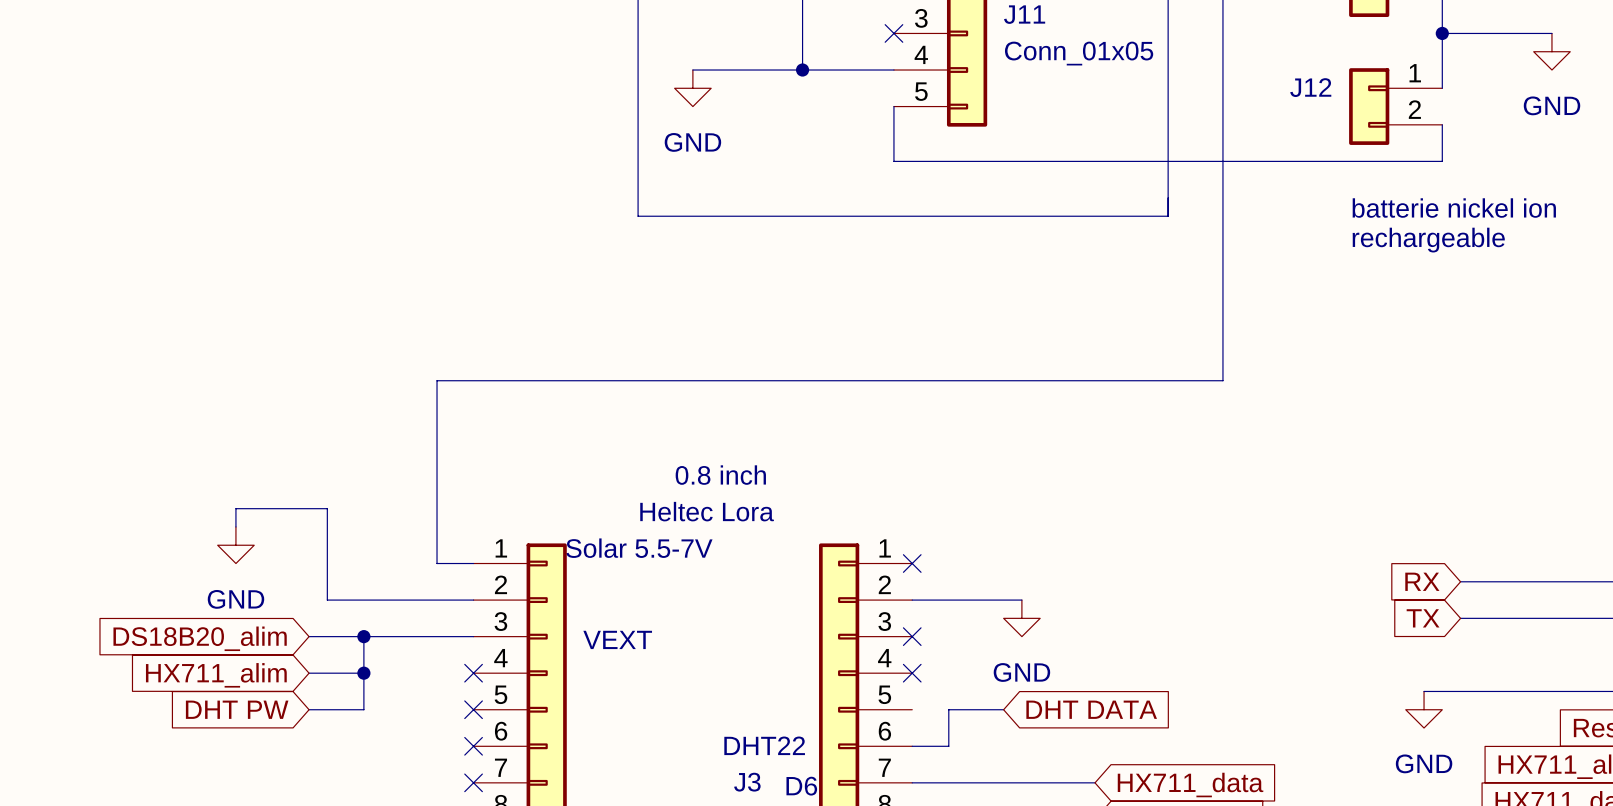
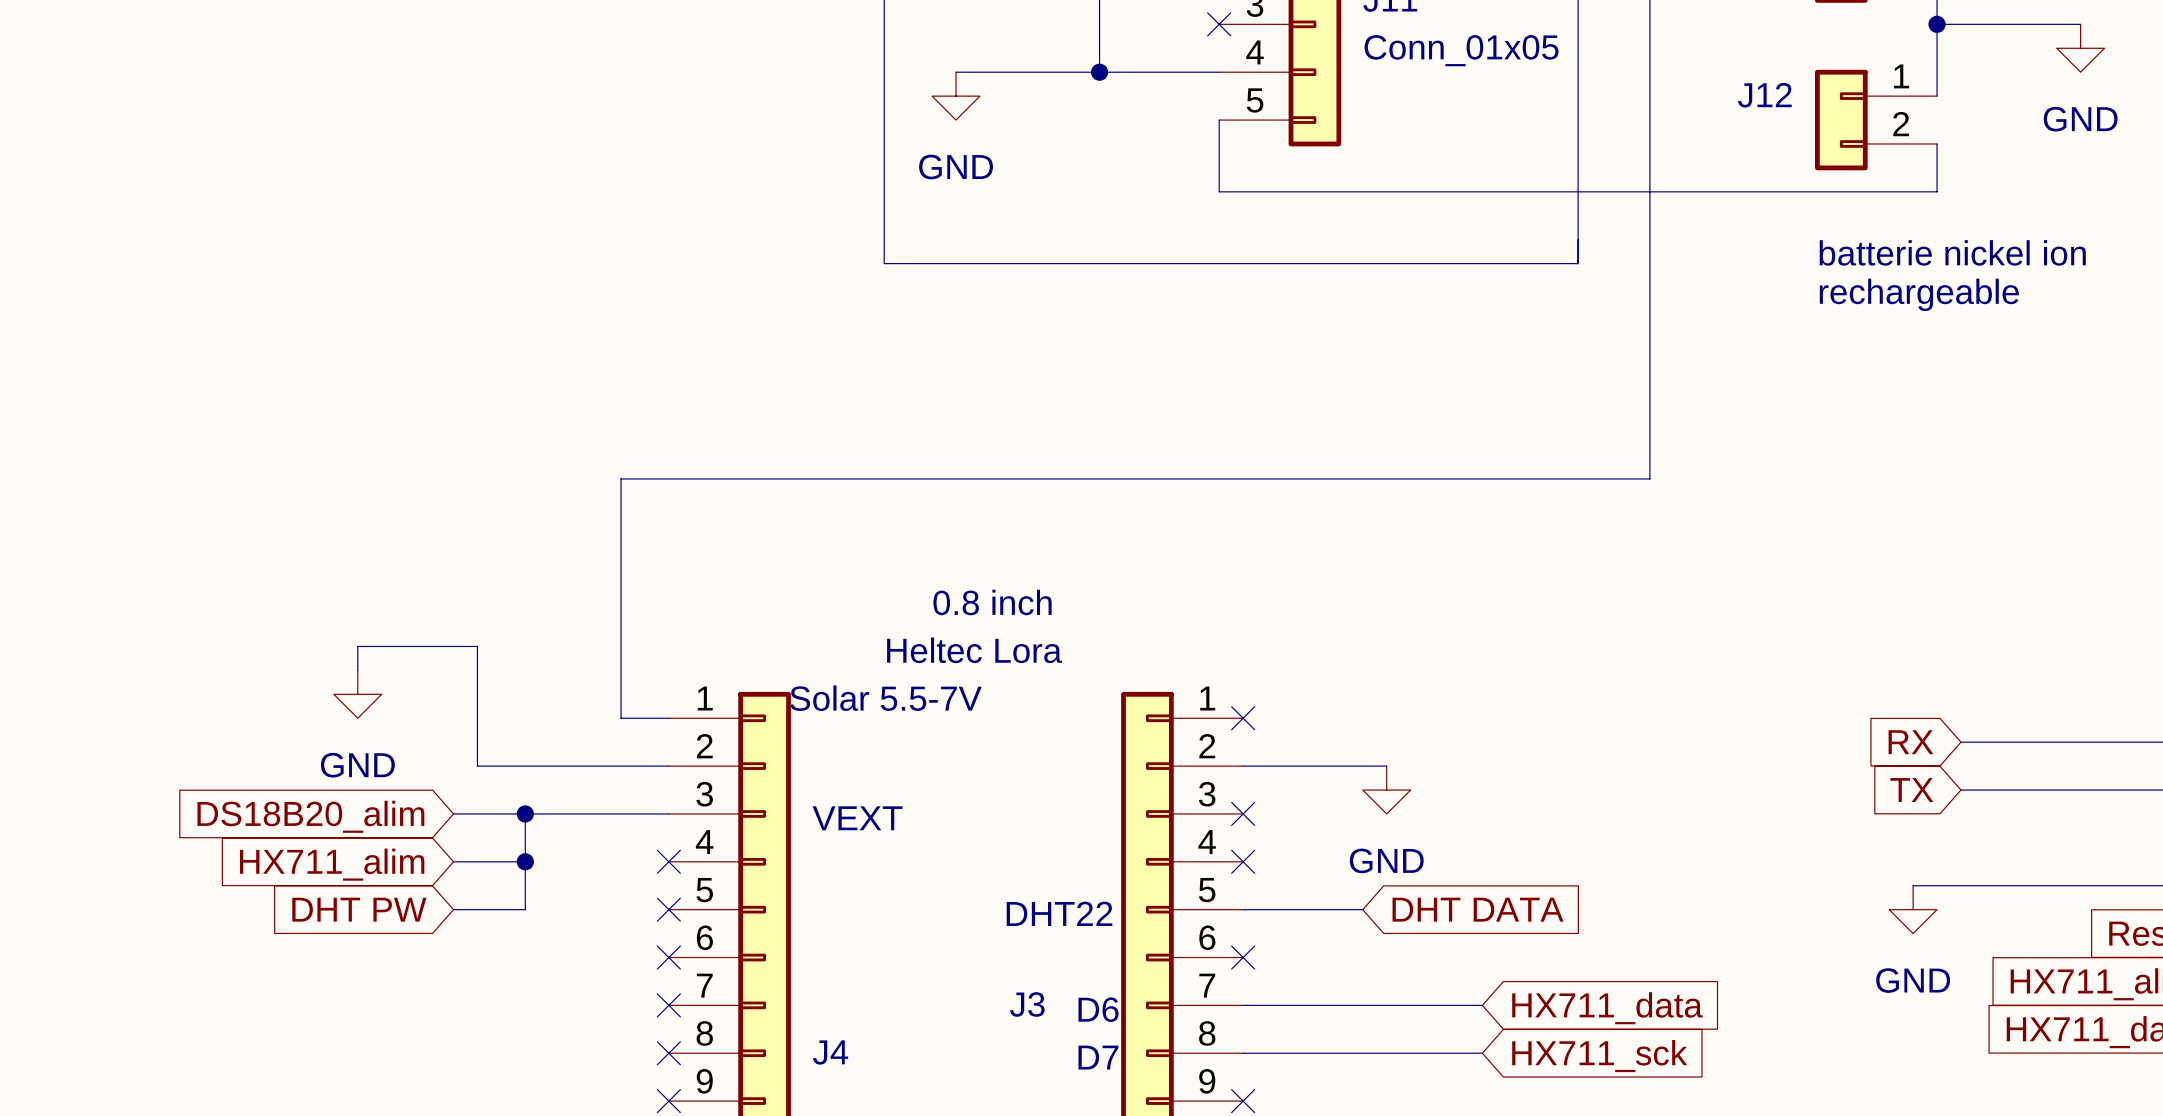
wire: (948, 709) (948, 746) (912, 746) -> (1290, 909) (1243, 909)
text position: DHT22 (764, 745) -> DHT22 (1059, 913)
no-connect mark: none -> (1243, 957)

